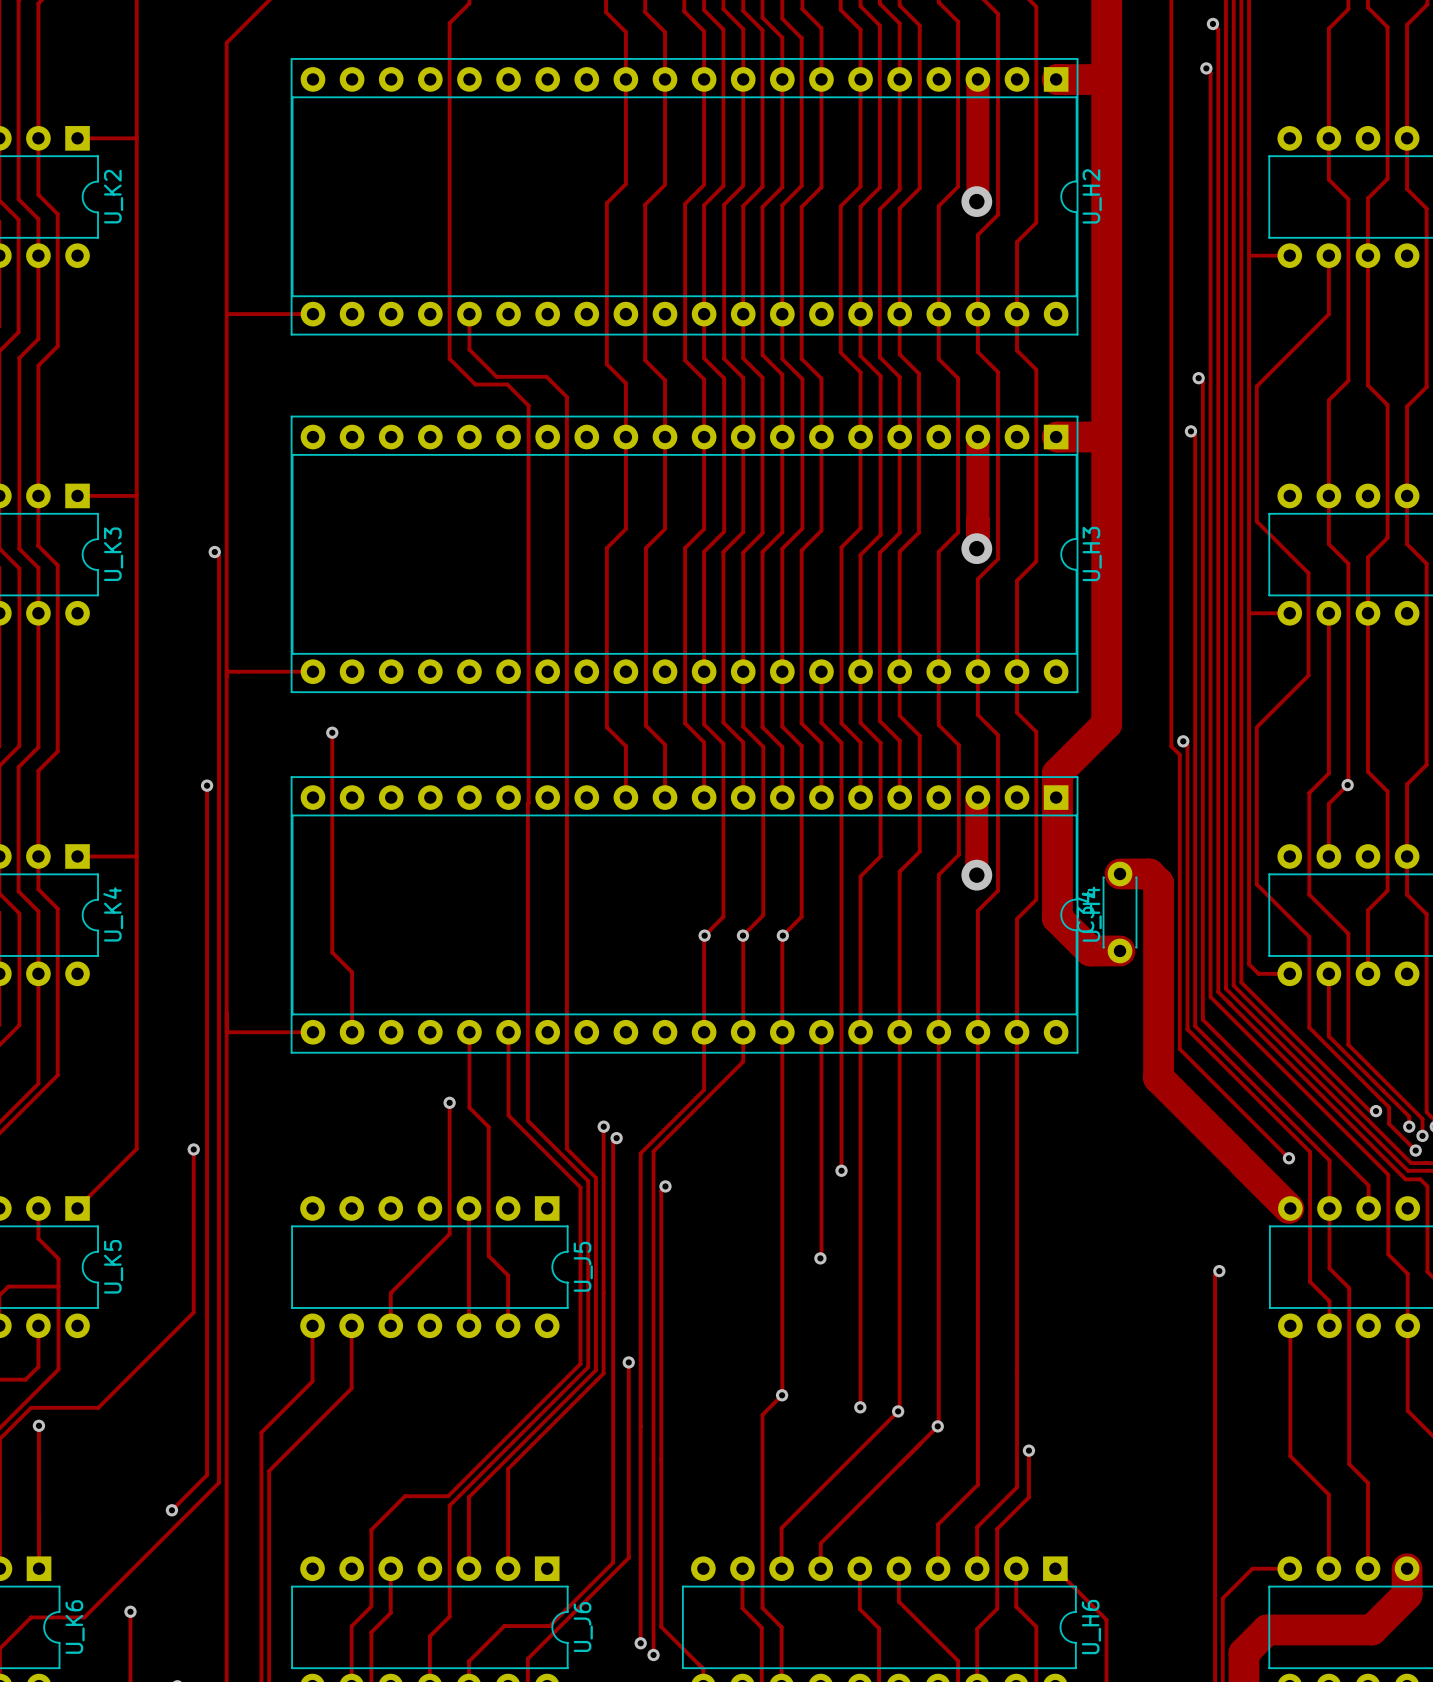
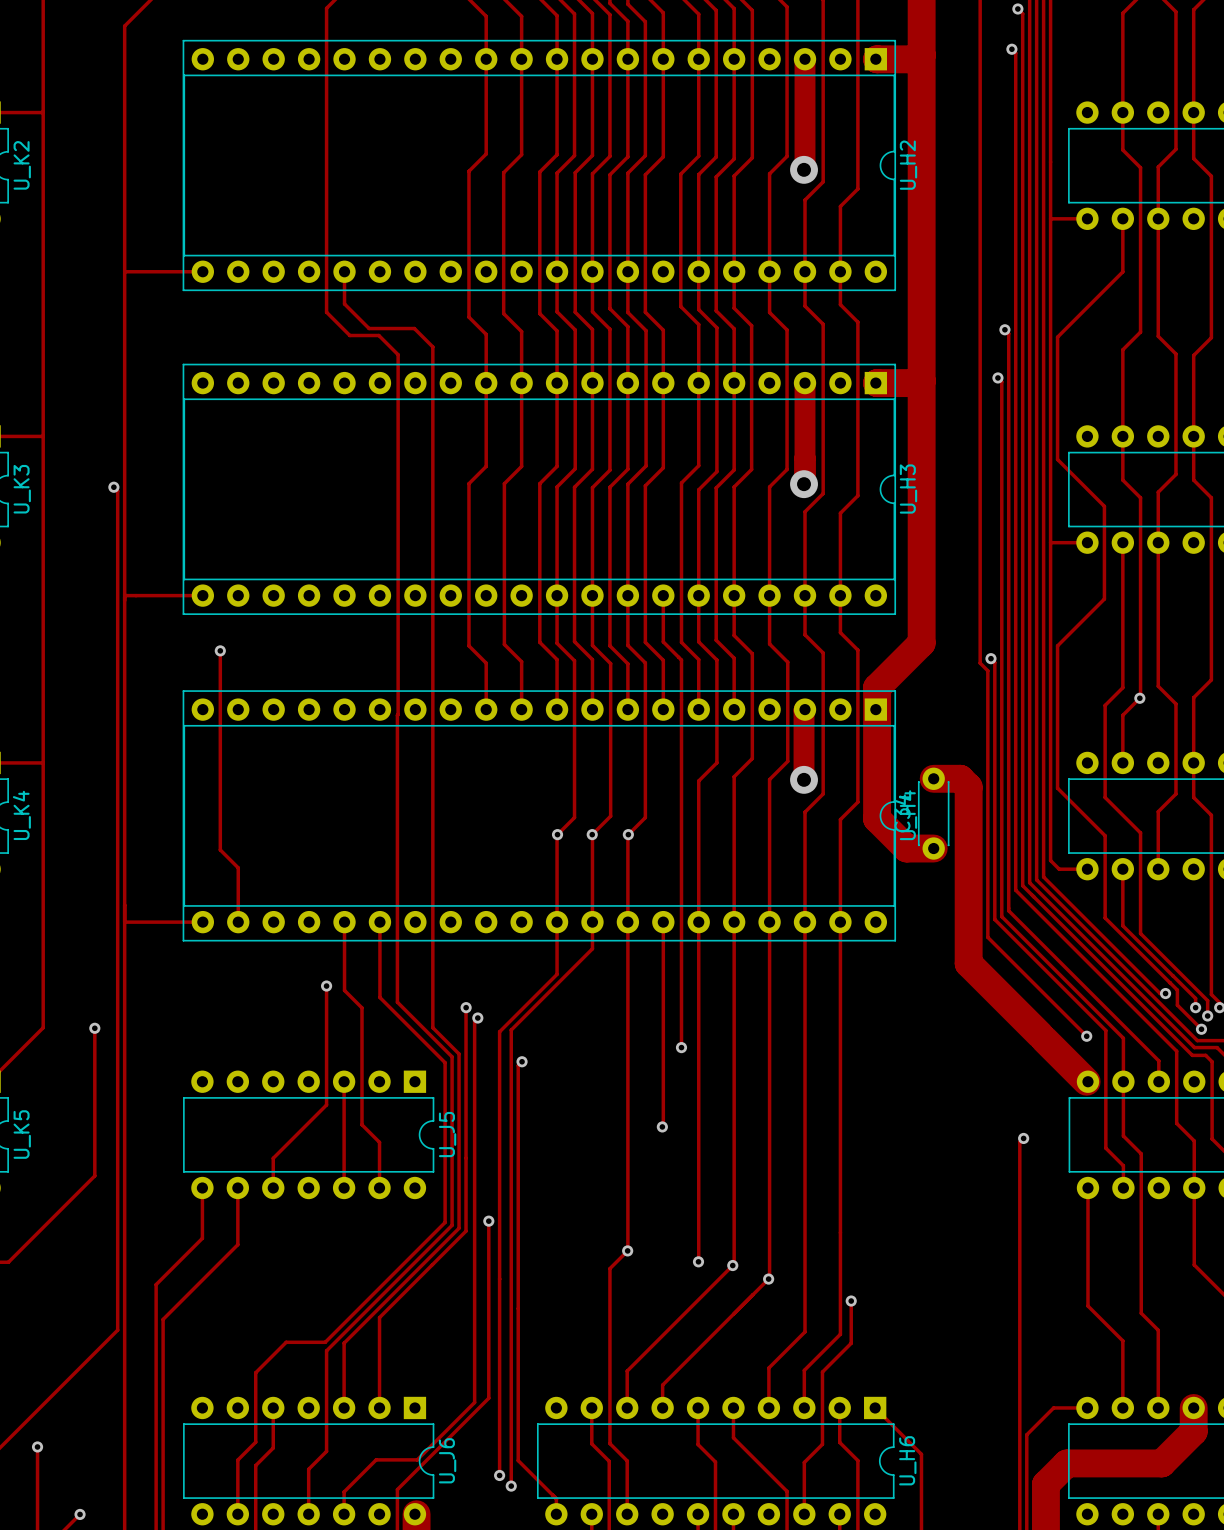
track: (207, 785) (207, 1475) (171, 1510) -> none
via: (207, 785) -> none
via: (171, 1510) -> none

